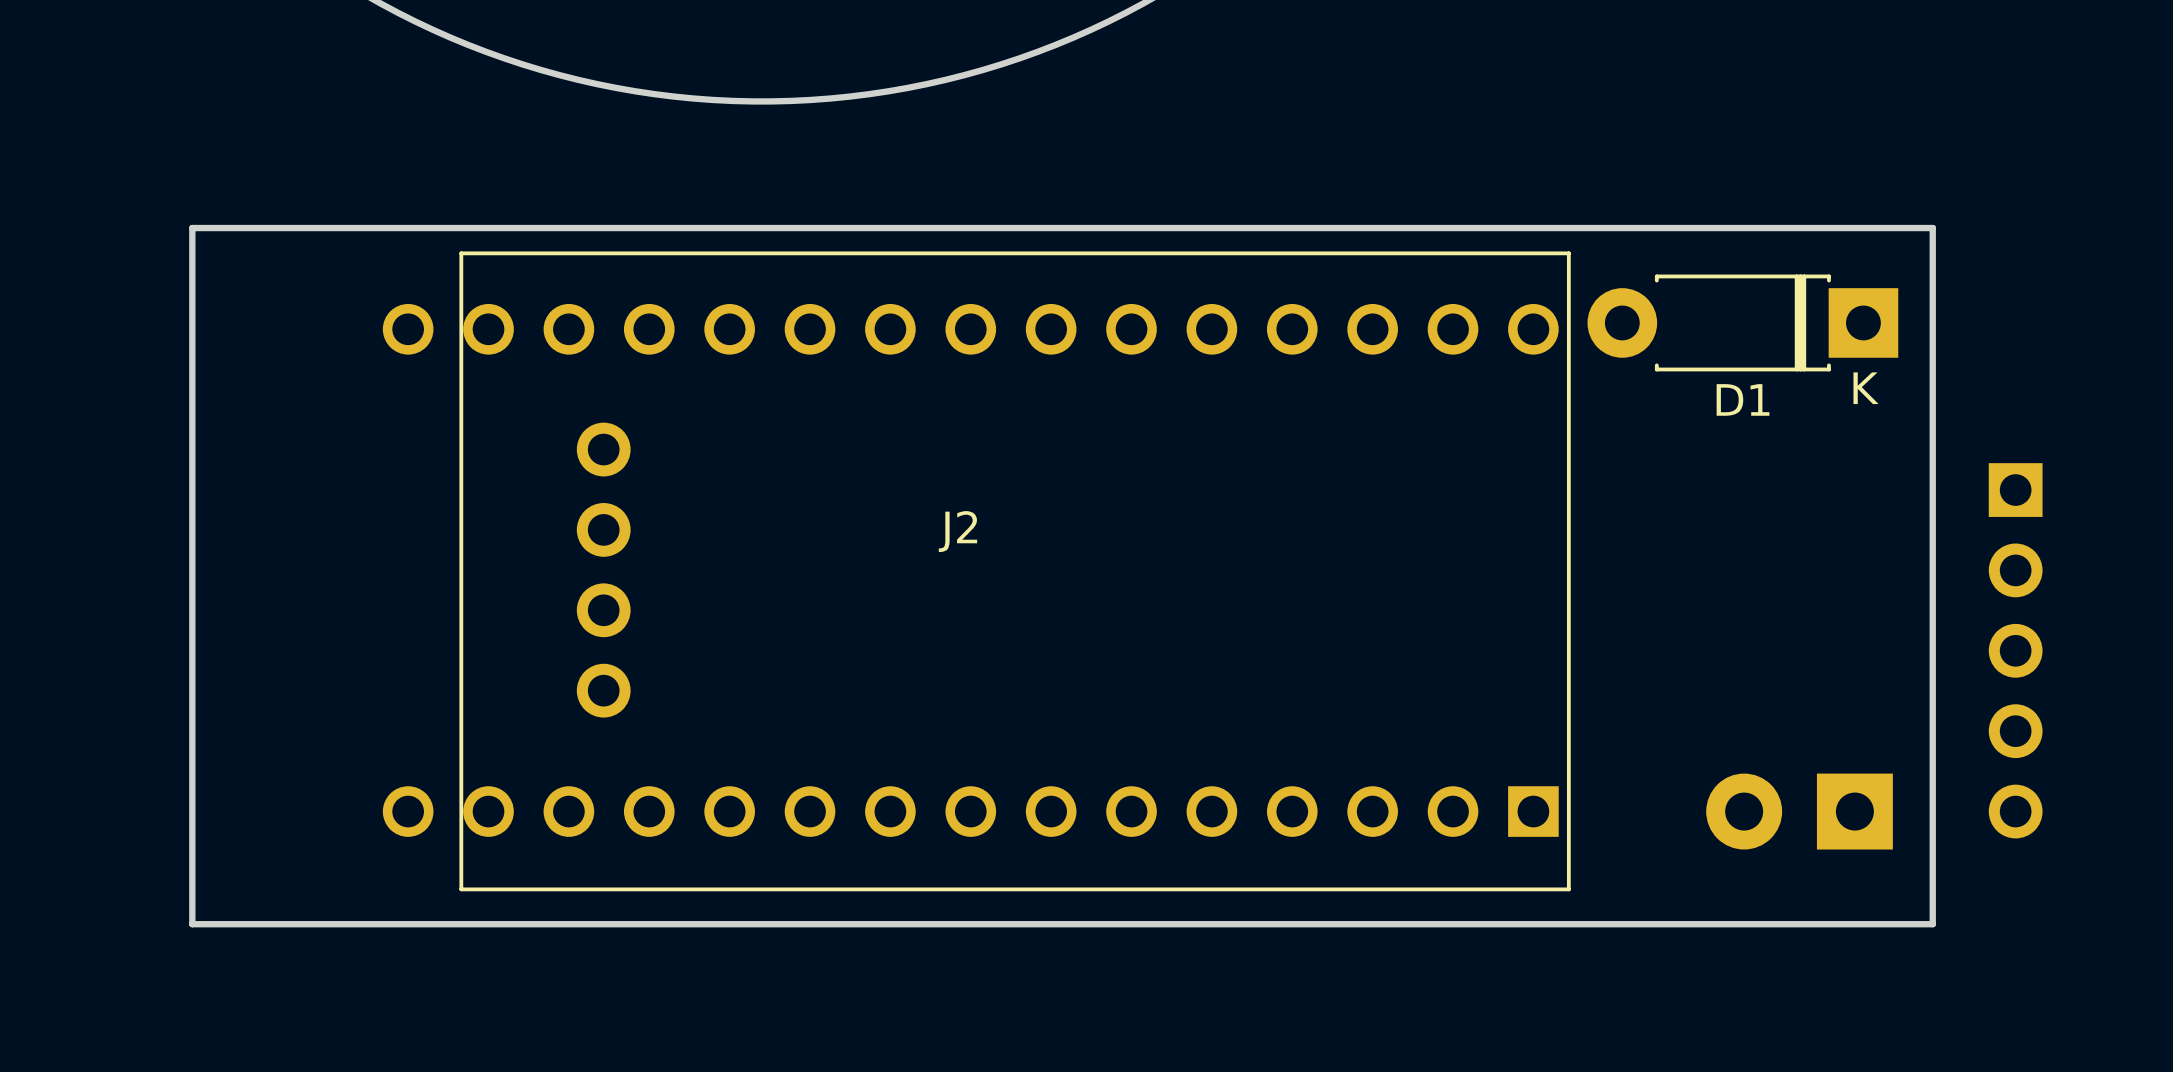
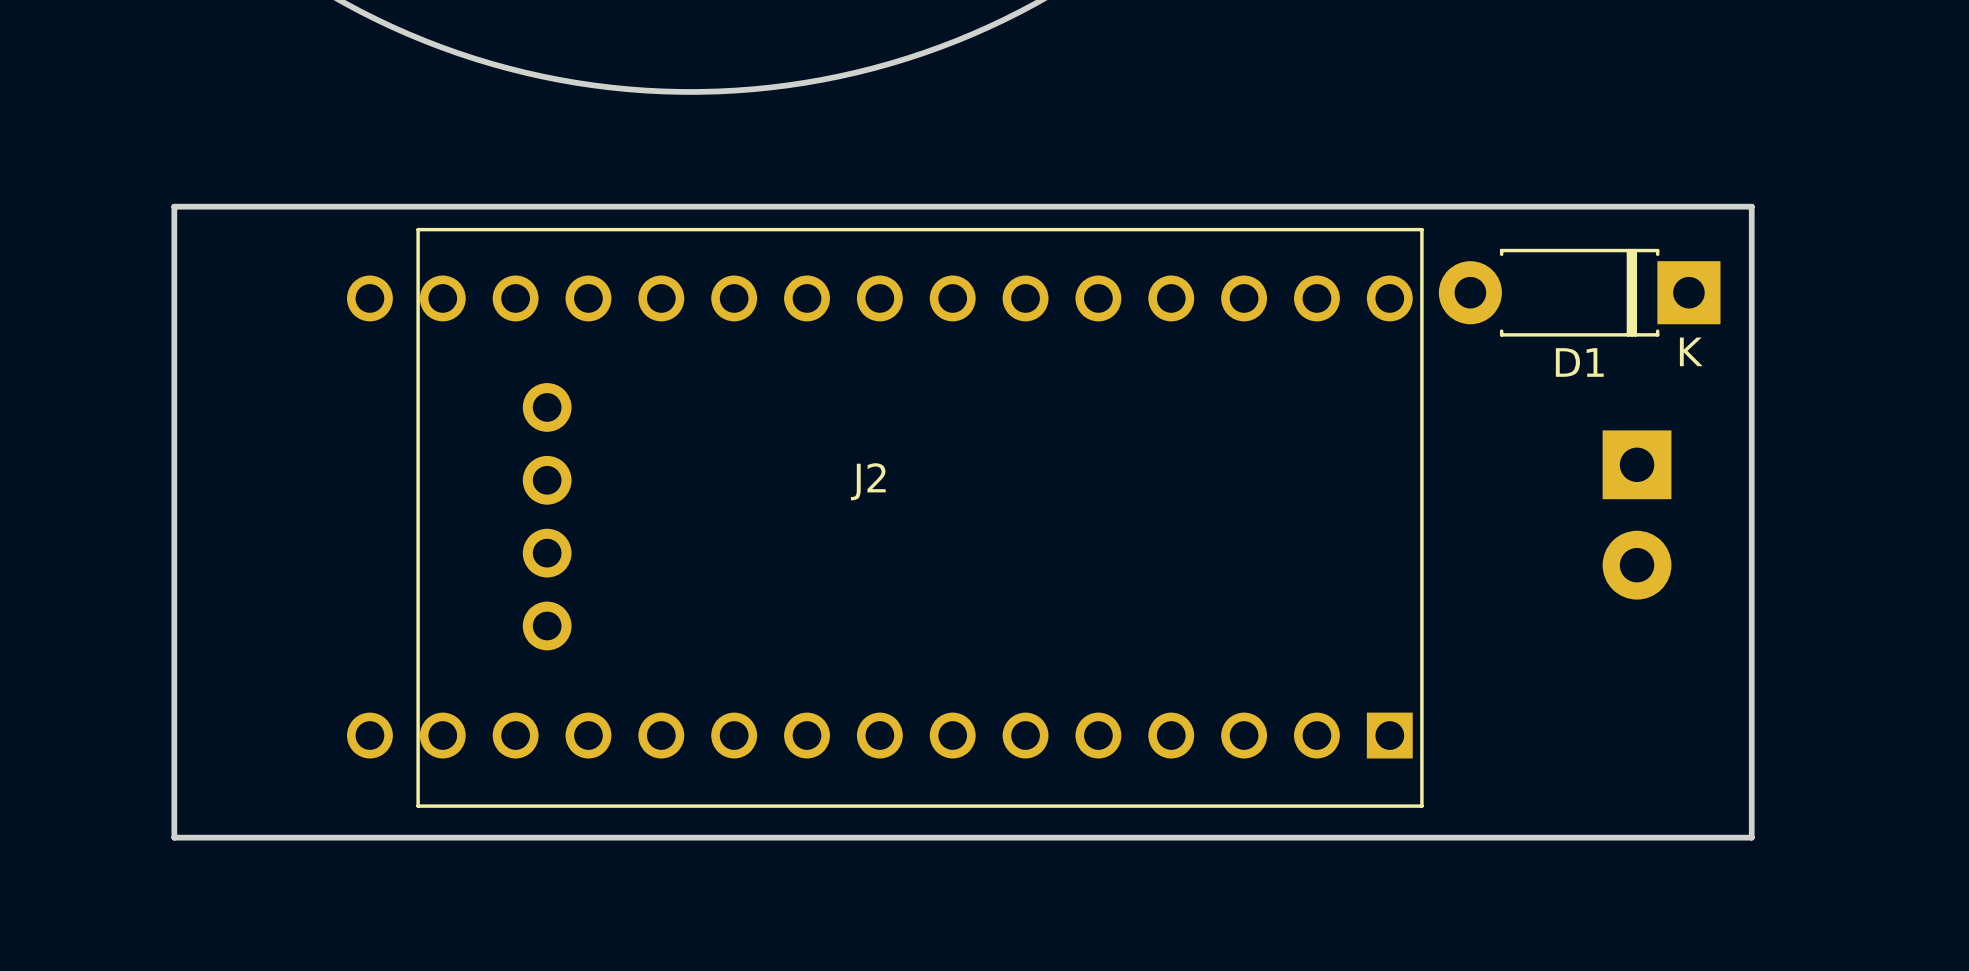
part: (2015, 650) -> none
part rotation: 0° (1799, 811) -> 90° counterclockwise (1637, 514)
part position: (1799, 811) -> (1637, 514)

